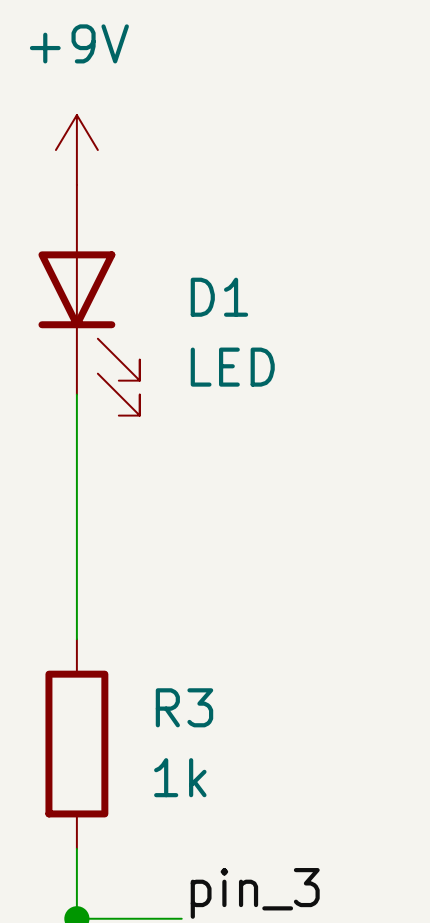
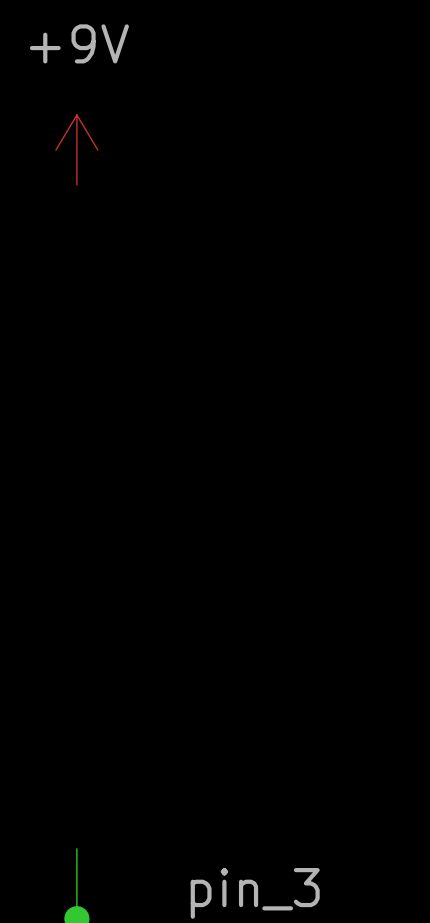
D1: LED (89, 300) -> none
wire: (76, 394) (76, 639) -> none
R3: 1k (76, 744) -> none
wire: (76, 918) (181, 918) -> none

